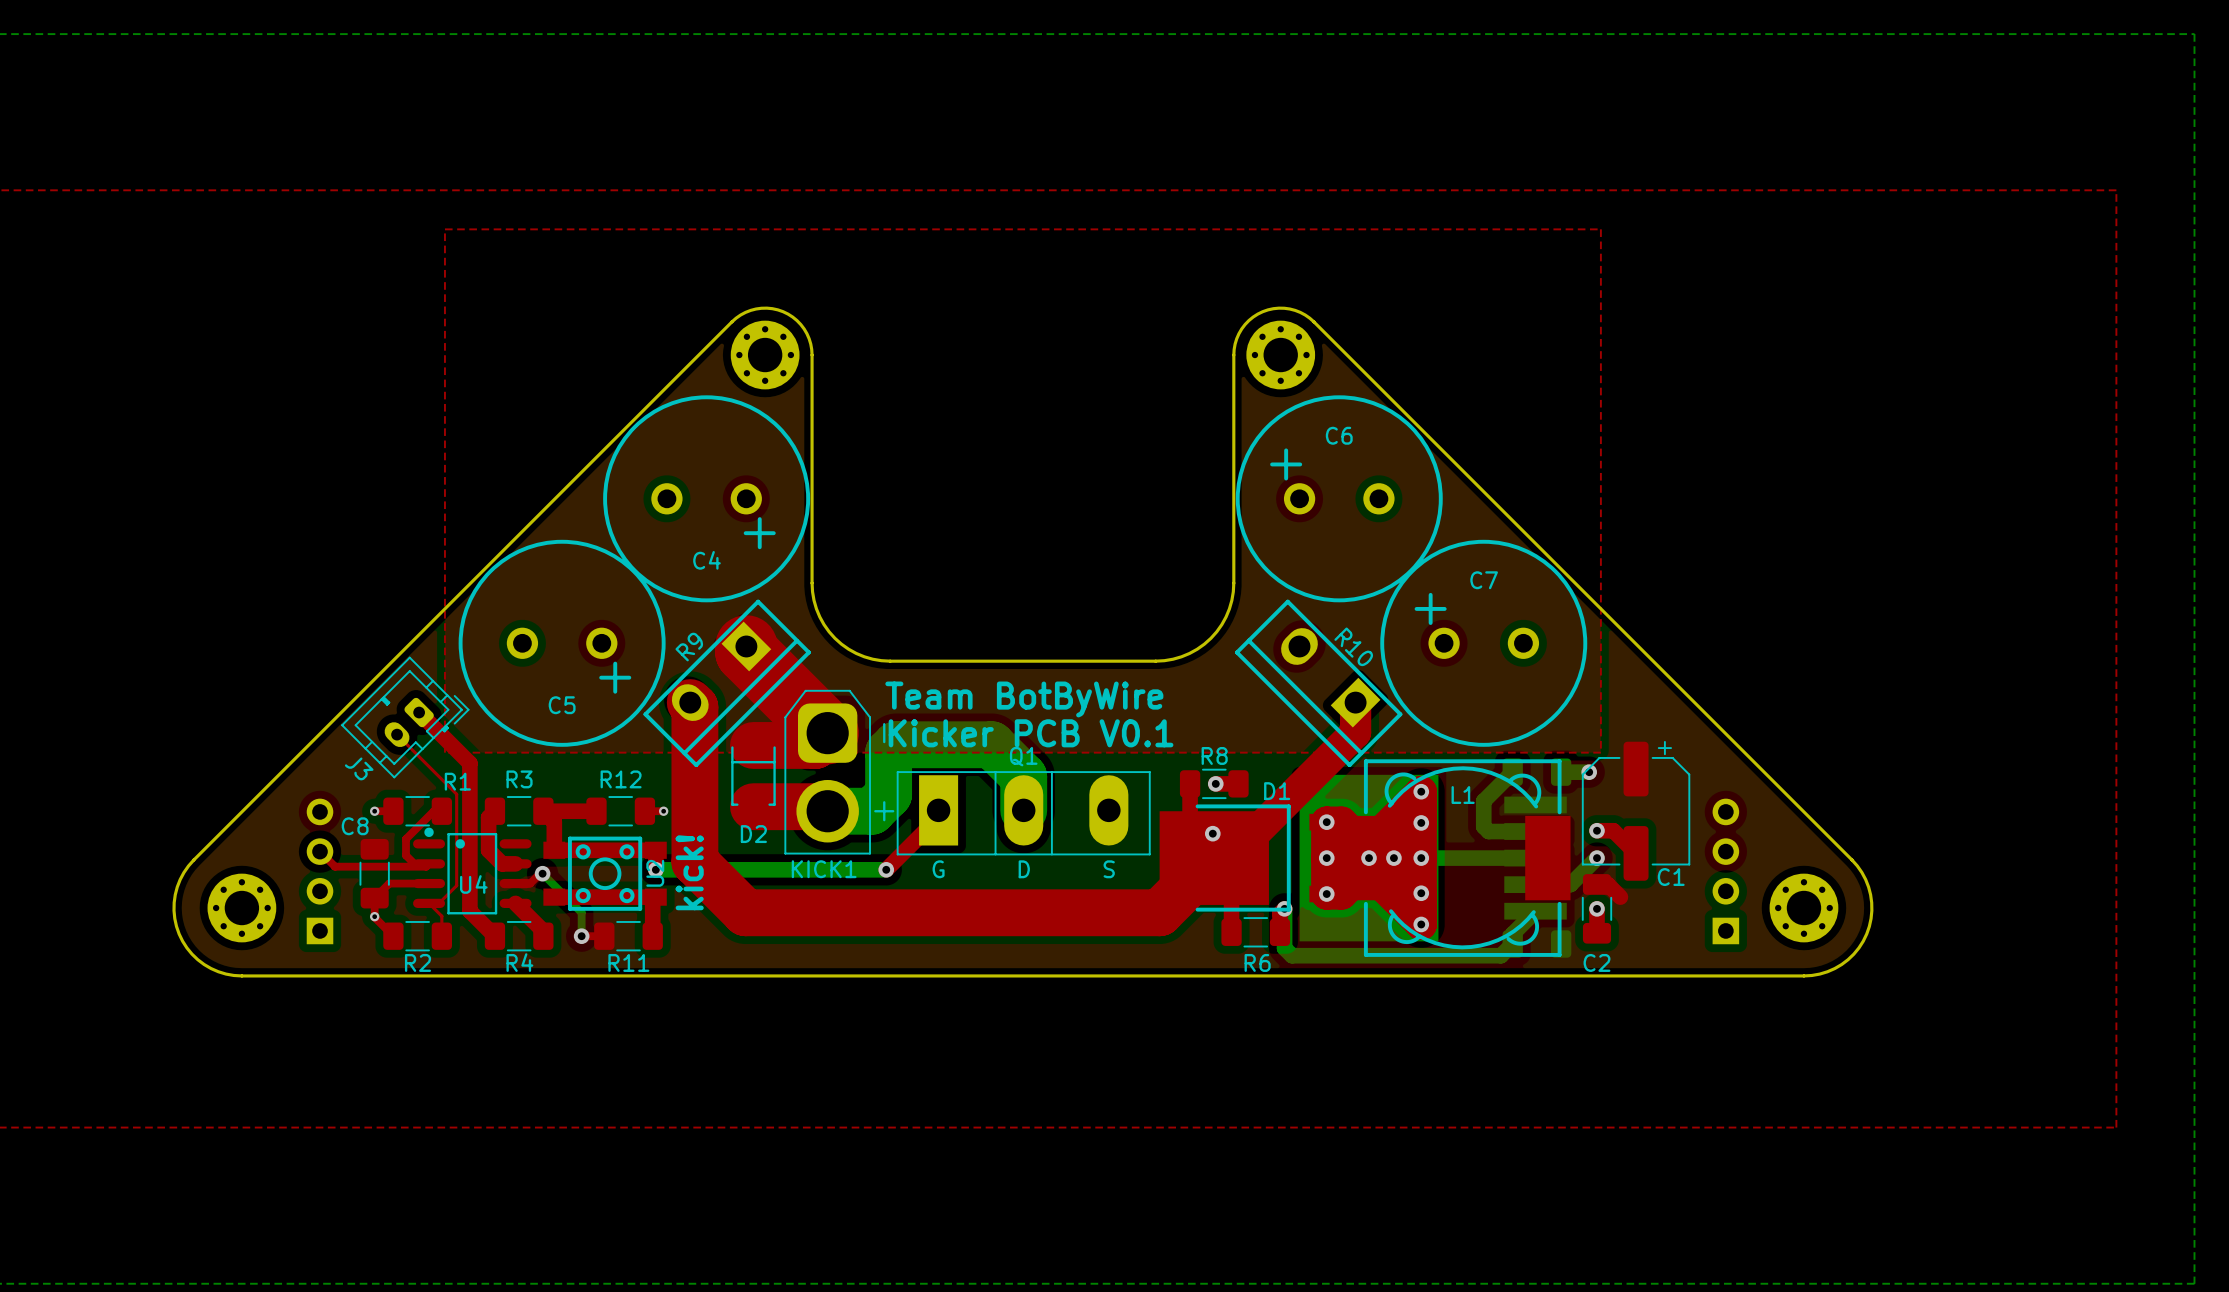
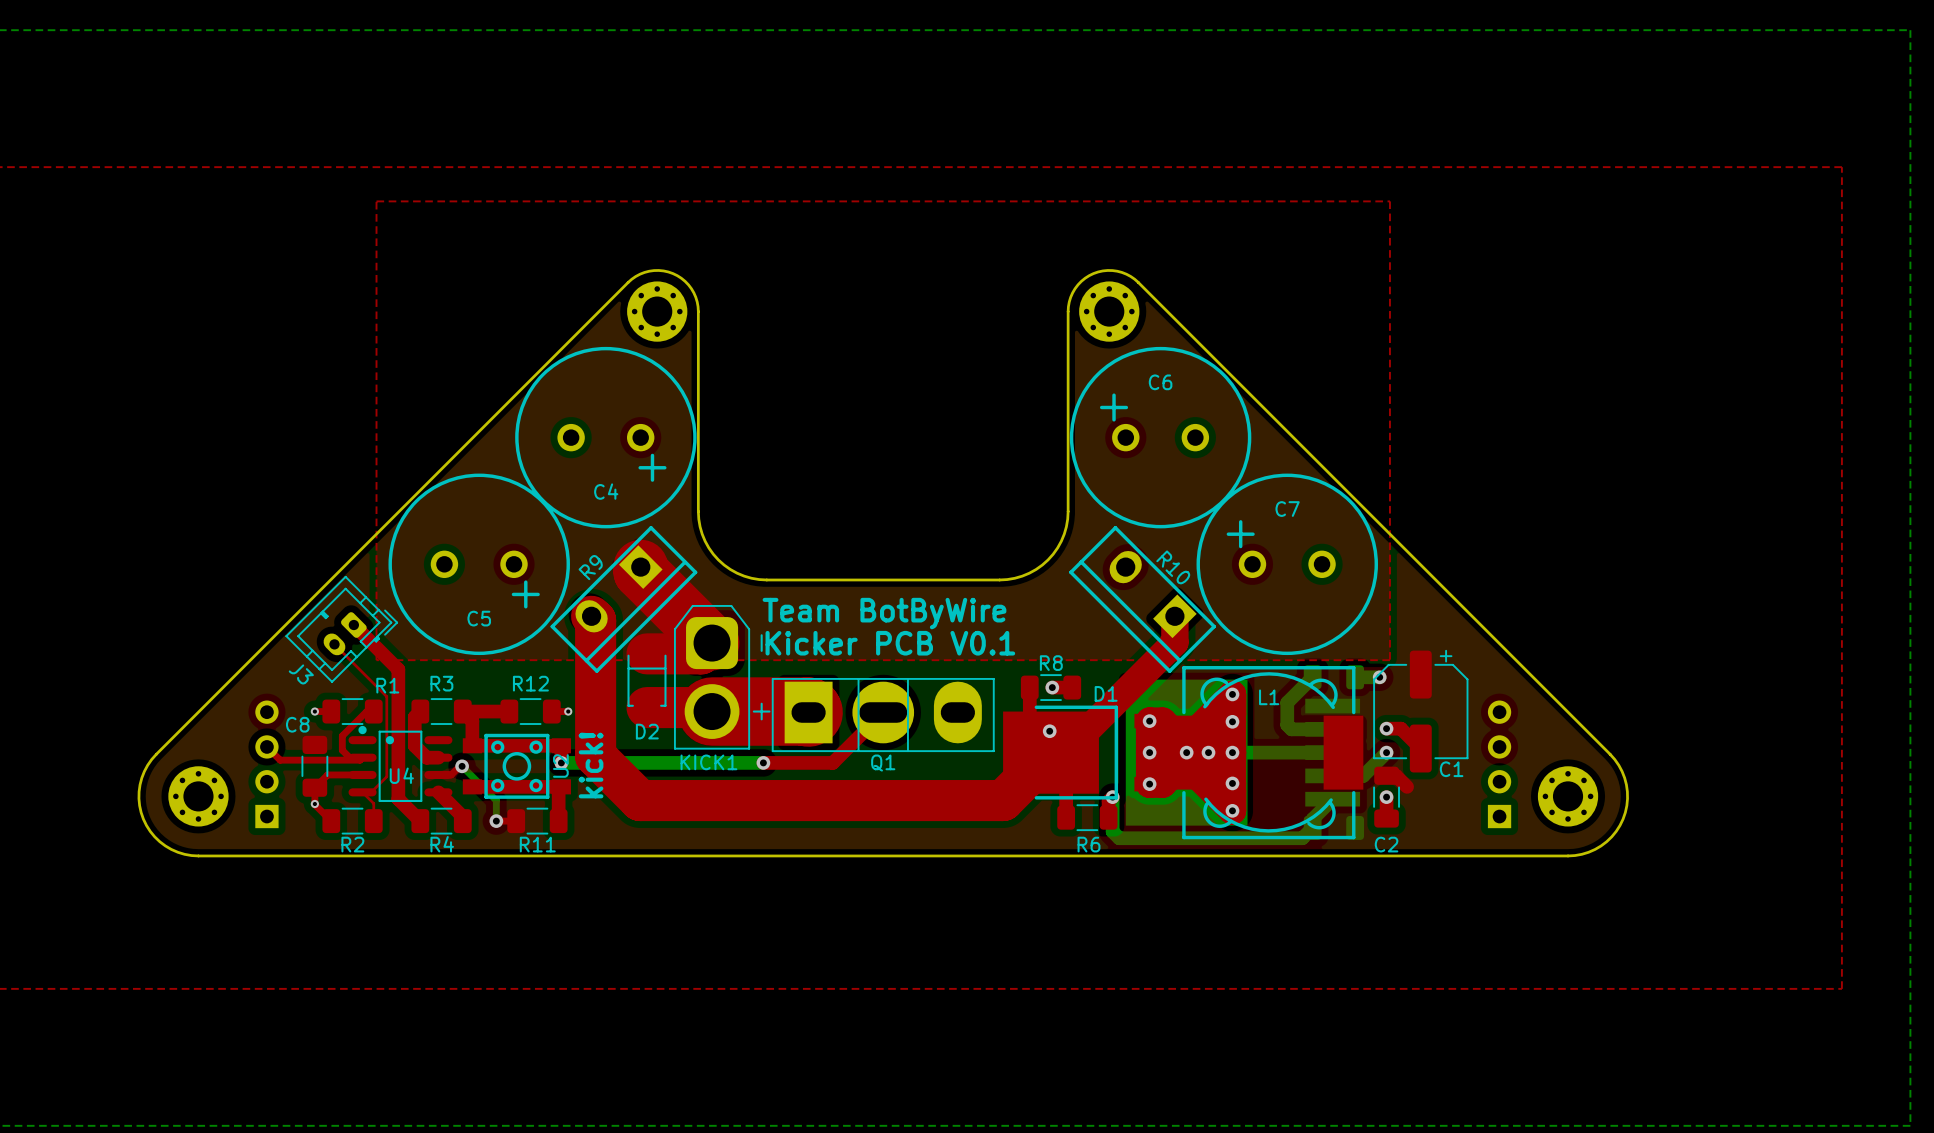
Q1 name position: Q1 (1023, 756) -> Q1 (883, 763)
Q1 footprint: [896, 771, 1151, 856] -> [771, 678, 995, 752]
top track: (938, 810) (938, 817) (886, 869) -> (883, 712) (832, 762) (763, 762)
bottom track: (1023, 810) (1023, 776) (991, 744) (896, 744) (888, 752) (888, 794) (871, 811) (827, 811) -> none
top track: none -> (712, 711) (808, 712)

